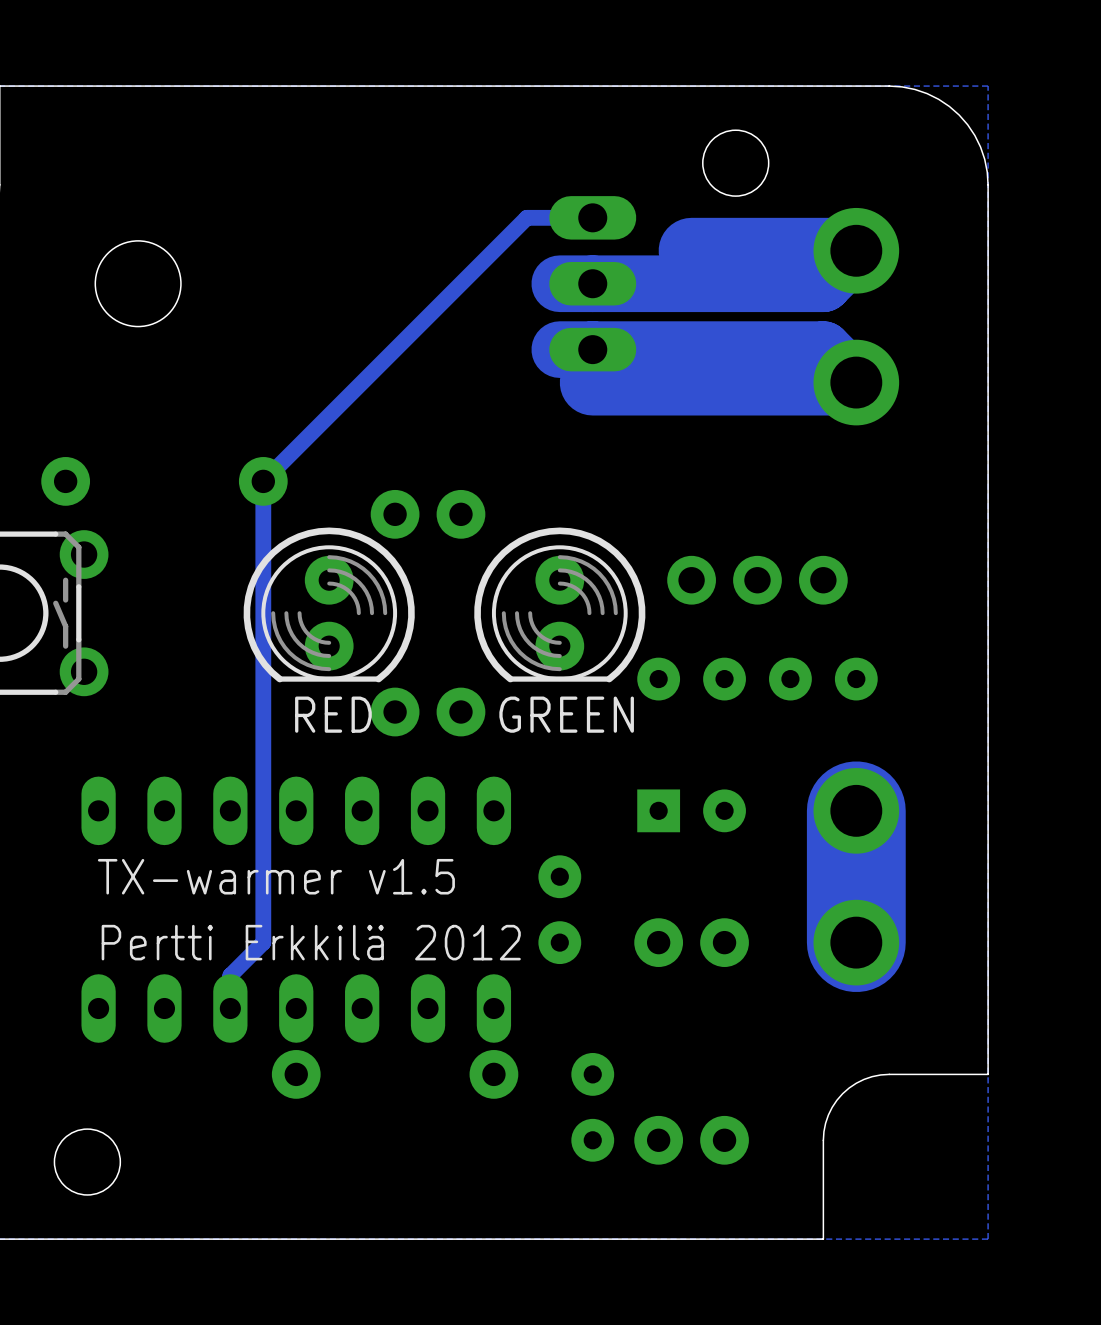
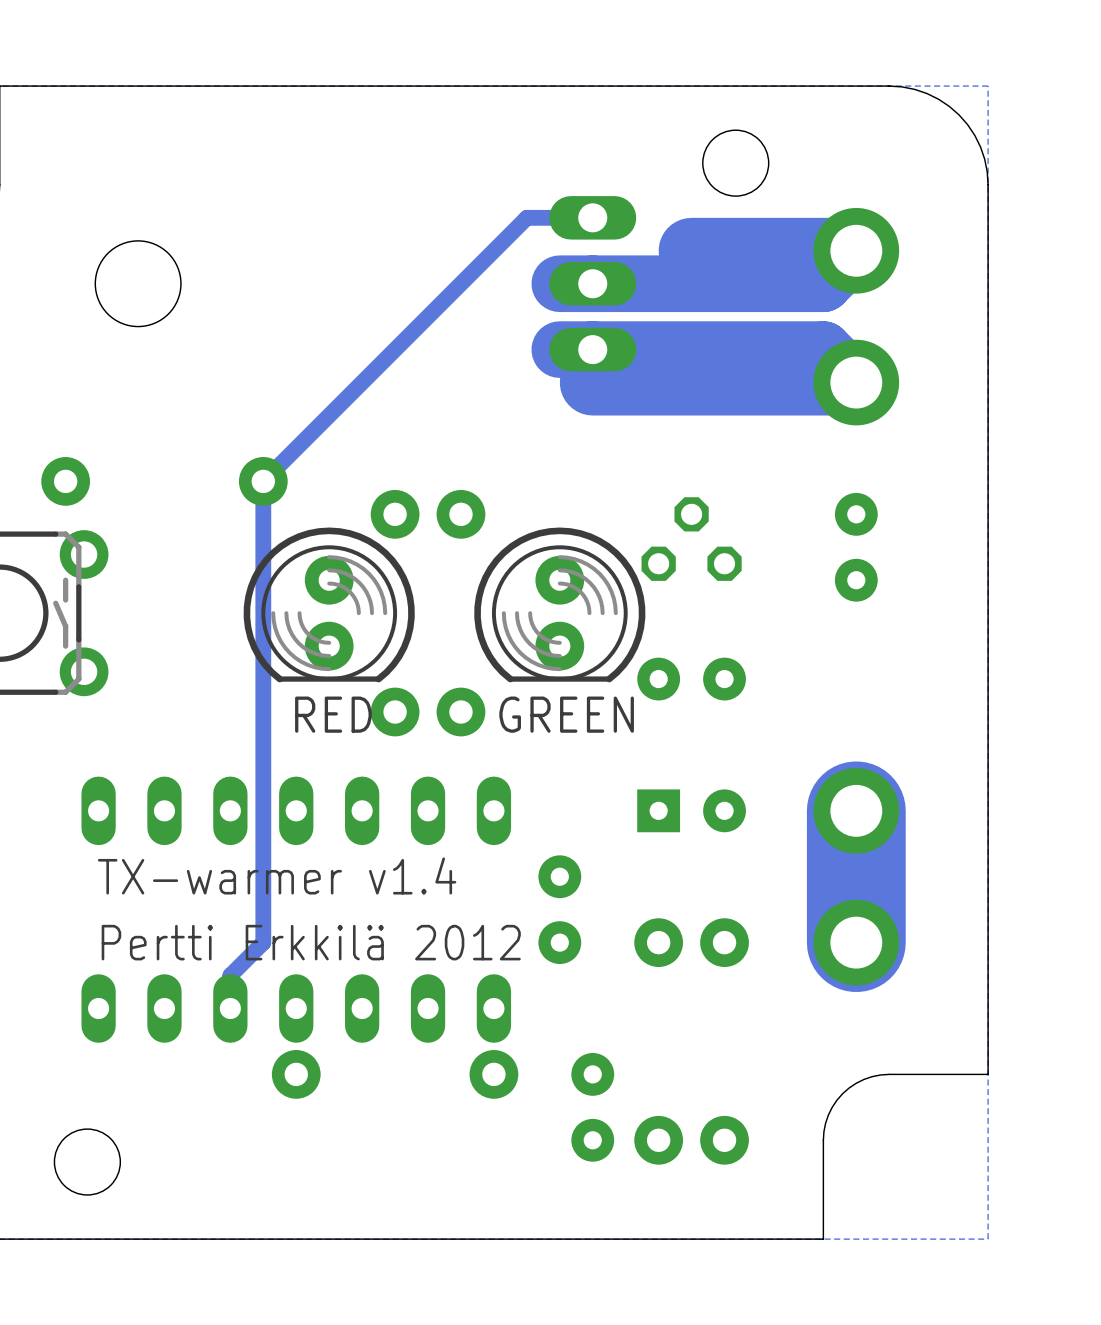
part: none -> (691, 539)
part: (757, 580) -> none
part rotation: 0° (823, 679) -> 90° clockwise (856, 547)
part position: (823, 679) -> (856, 547)
text: TX-warmer v1.5 (276, 876) -> TX-warmer v1.4 (277, 875)

